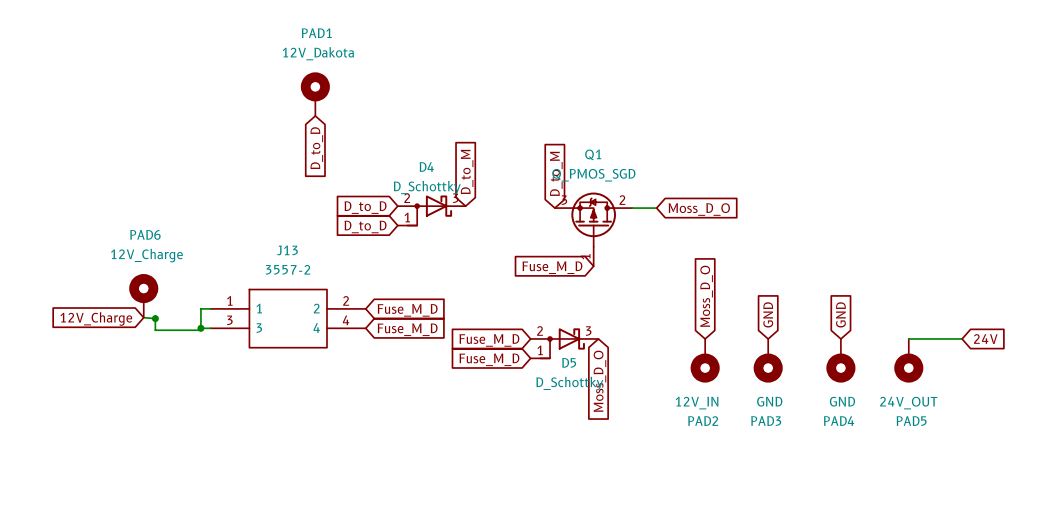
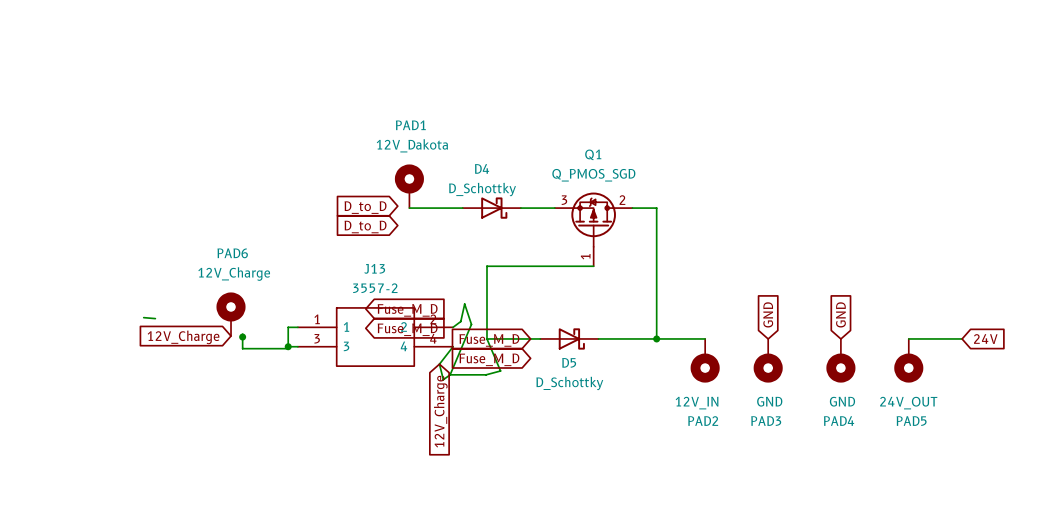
PAD1 position: (315, 94) -> (409, 186)
global label: D_to_D (316, 148) -> none
global label: D_to_M (467, 172) -> none
global label: D_to_M (556, 173) -> none
D4 symbol: [397, 195, 466, 226] -> [462, 197, 521, 219]
wire: none -> (409, 208) (462, 208)
wire: none -> (520, 208) (554, 208)
wire: none -> (656, 208) (656, 338)
global label: Moss_D_O (699, 209) -> none
wire: none -> (593, 266) (486, 266) (486, 338)
global label: Fuse_M_D (552, 267) -> none
PAD6 position: (143, 295) -> (231, 314)
global label: Moss_D_O (706, 296) -> none
wire: (210, 308) (200, 308) (200, 330) (155, 330) (155, 315) -> (297, 327) (288, 327) (288, 348) (242, 348) (242, 334)
global label position: 12V_Charge (96, 318) -> 12V_Charge (183, 337)
junction: (155, 318) -> none
J13 position: (288, 318) -> (375, 337)
wire: none -> (453, 327) (460, 321) (464, 304) (471, 324) (450, 374) (443, 379) (439, 364) (453, 346)
wire: (200, 328) (210, 328) -> (288, 346) (297, 346)
junction position: (200, 328) -> (242, 337)
D5 symbol: [530, 328, 599, 359] -> [540, 328, 599, 350]
wire: none -> (486, 338) (540, 338)
wire: none -> (486, 338) (500, 370) (486, 374) (451, 374)
wire: none -> (598, 338) (705, 338)
junction: none -> (656, 338)
junction: none -> (288, 346)
global label: Moss_D_O (599, 381) -> none
global label: none -> 12V_Charge (440, 411)

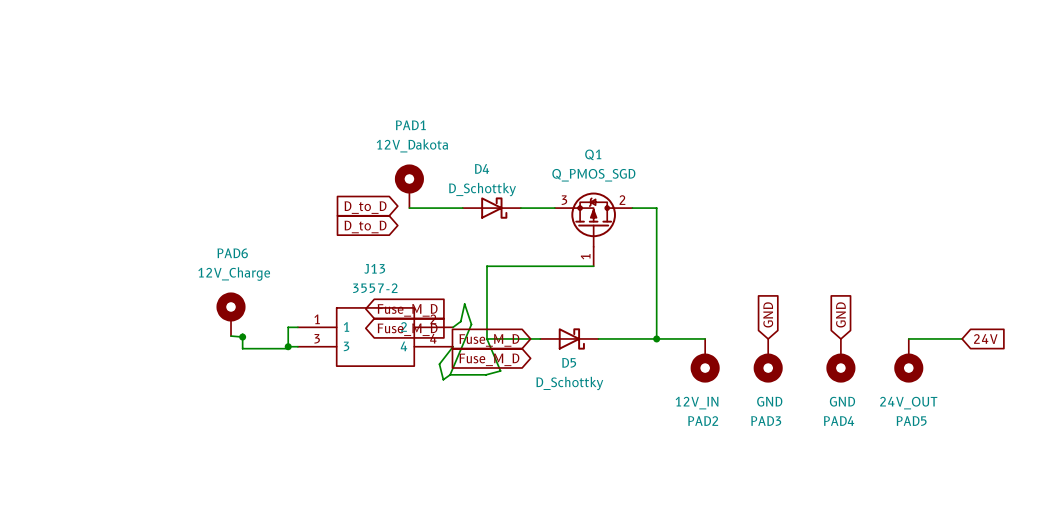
wire: (143, 317) (155, 318) -> (231, 336) (242, 337)
global label: 12V_Charge (183, 337) -> none
global label: 12V_Charge (440, 411) -> none

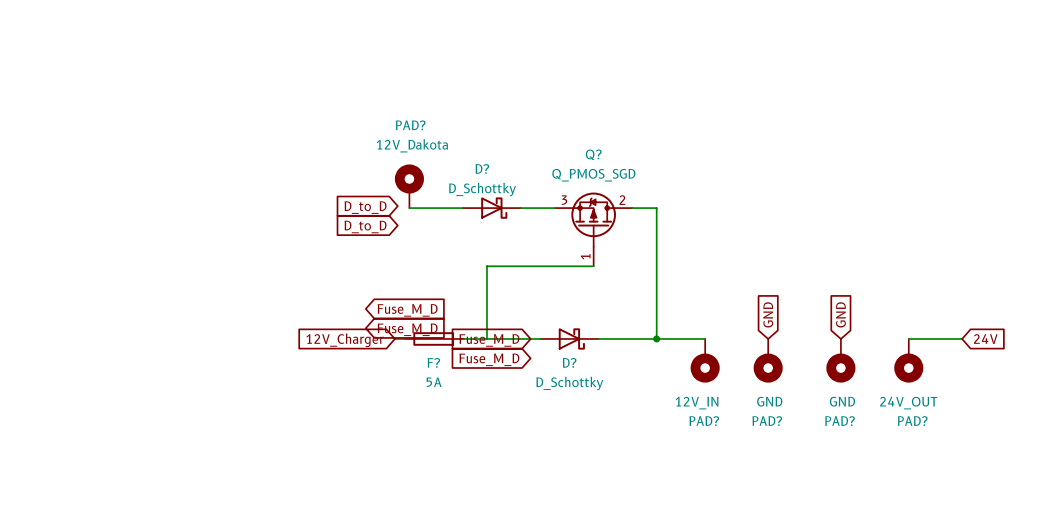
PAD1 name: PAD1 (410, 125) -> PAD? (410, 125)
Q1 name: Q1 (593, 154) -> Q? (593, 154)
D4 name: D4 (482, 168) -> D? (482, 168)
PAD6: 12V_Charge (231, 314) -> none
wire: (297, 327) (288, 327) (288, 348) (242, 348) (242, 334) -> none
wire: (453, 327) (460, 321) (464, 304) (471, 324) (450, 374) (443, 379) (439, 364) (453, 346) -> none
wire: (231, 336) (242, 337) -> none
junction: (242, 337) -> none
J13: 3557-2 (375, 337) -> none
F?: none -> 5A (433, 338)
wire: (486, 338) (500, 370) (486, 374) (451, 374) -> (486, 338) (462, 338)
global label: none -> 12V_Charger (345, 340)
wire: (288, 346) (297, 346) -> (394, 338) (404, 338)
junction: (288, 346) -> none
D5 name: D5 (569, 362) -> D? (569, 362)
PAD2 name: PAD2 (703, 421) -> PAD? (704, 421)
PAD3 name: PAD3 (766, 421) -> PAD? (767, 421)
PAD4 name: PAD4 (839, 421) -> PAD? (840, 421)
PAD5 name: PAD5 (911, 421) -> PAD? (912, 421)

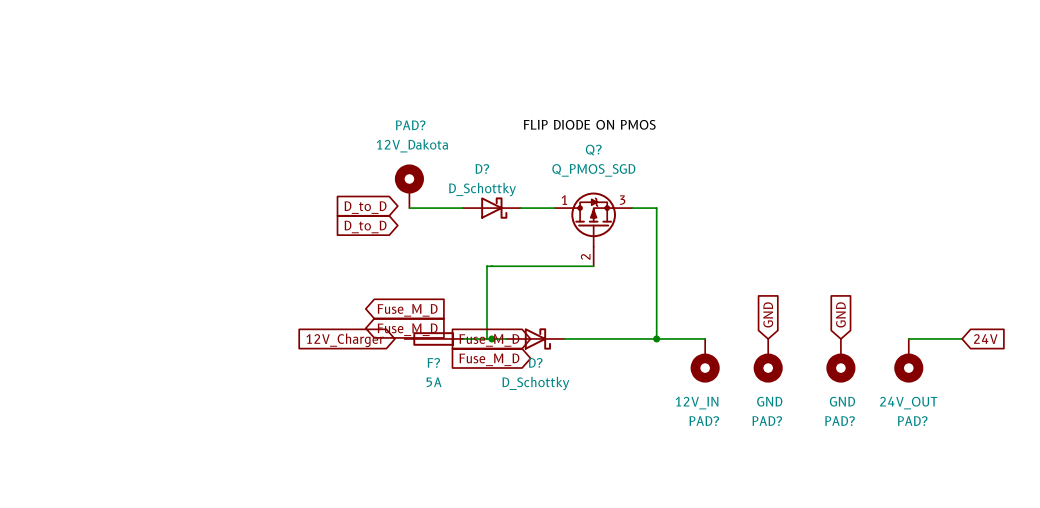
label: none -> FLIP DIODE ON PMOS (589, 124)
Q? symbol: [554, 192, 633, 267] -> [554, 192, 633, 267]
wire: (394, 338) (404, 338) -> none
junction: none -> (491, 338)
D? position: (569, 338) -> (535, 338)

